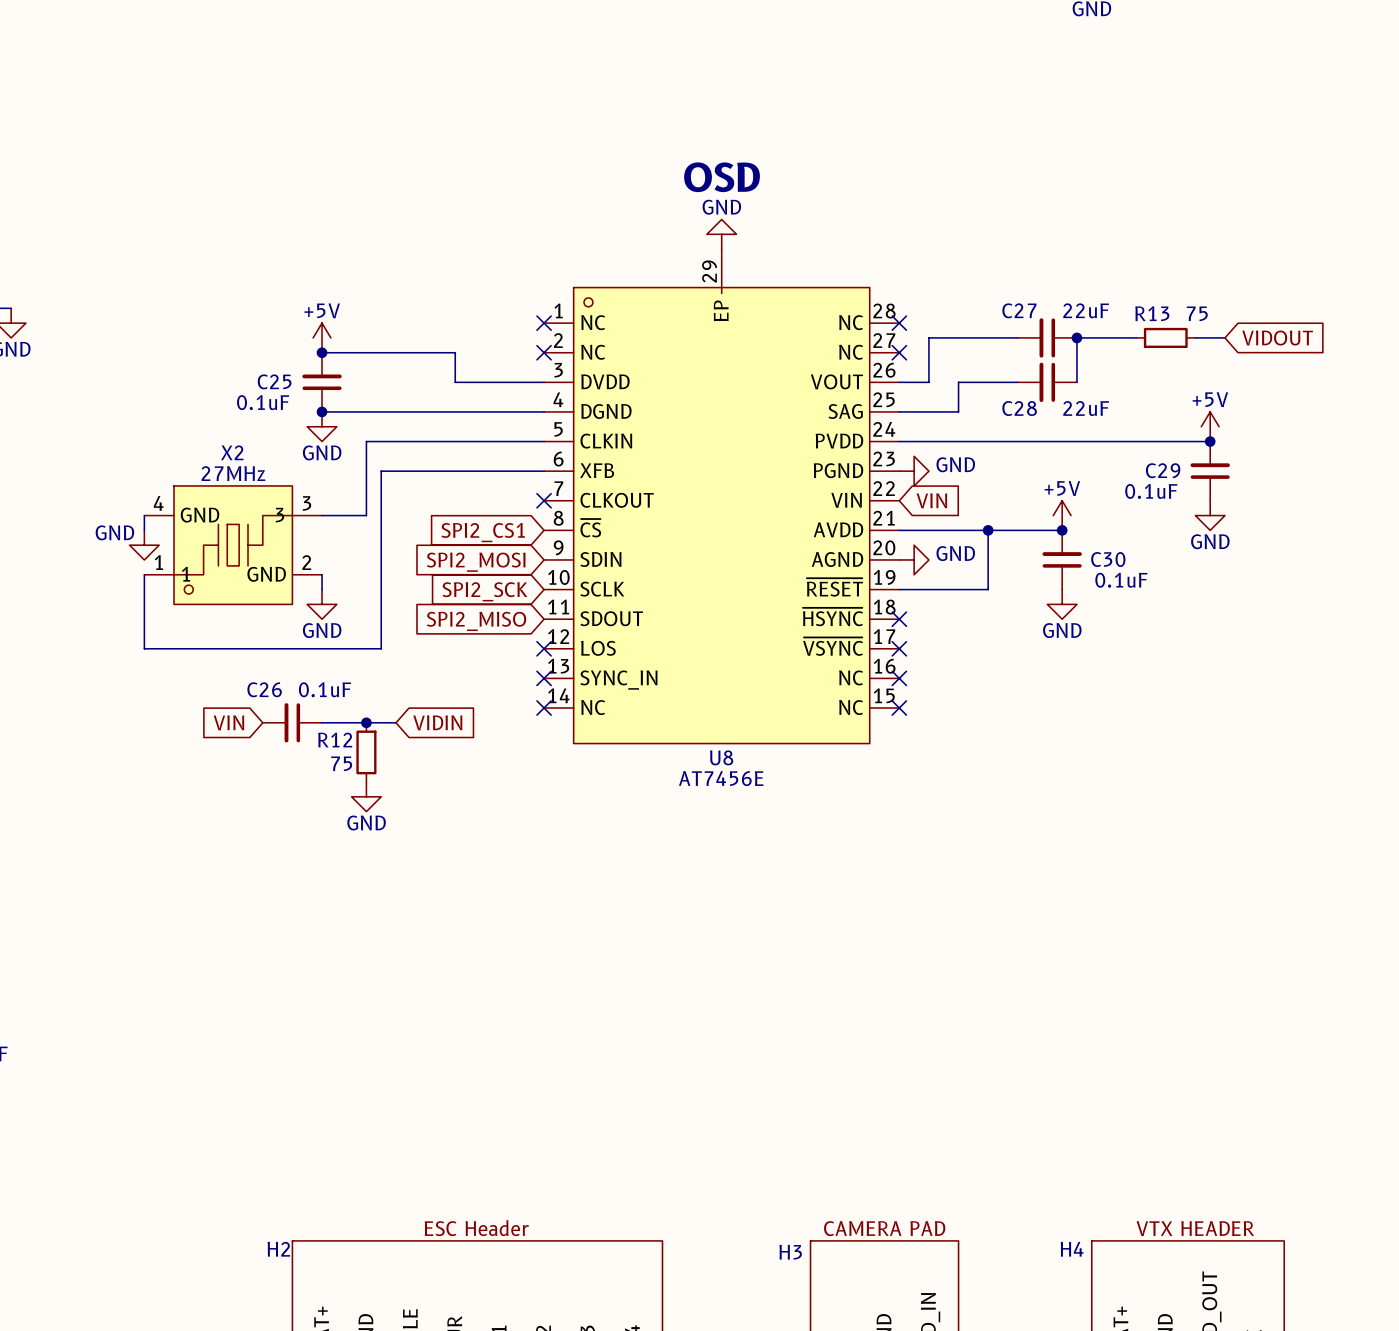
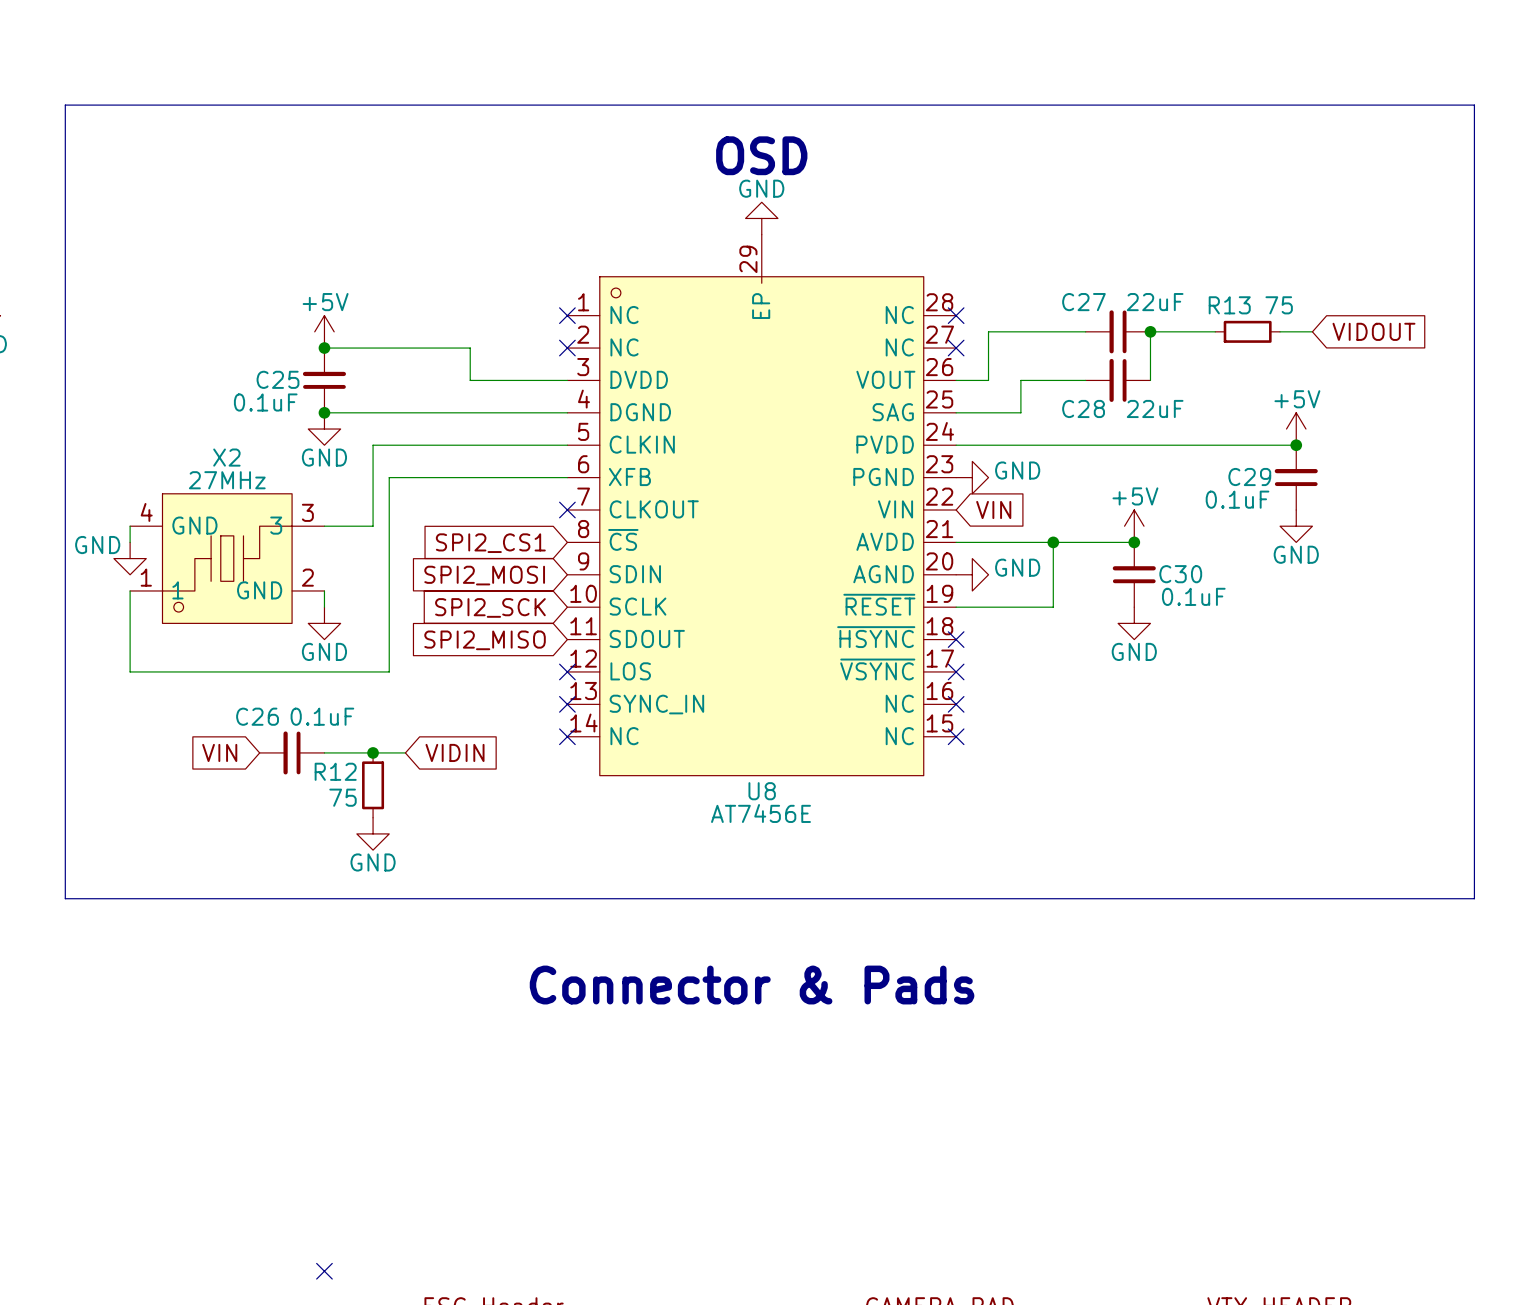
line: none -> (65, 105) (1474, 105) (1474, 898) (65, 898) (65, 105)
text: none -> Connector & Pads (752, 985)
no-connect mark: none -> (324, 1271)

